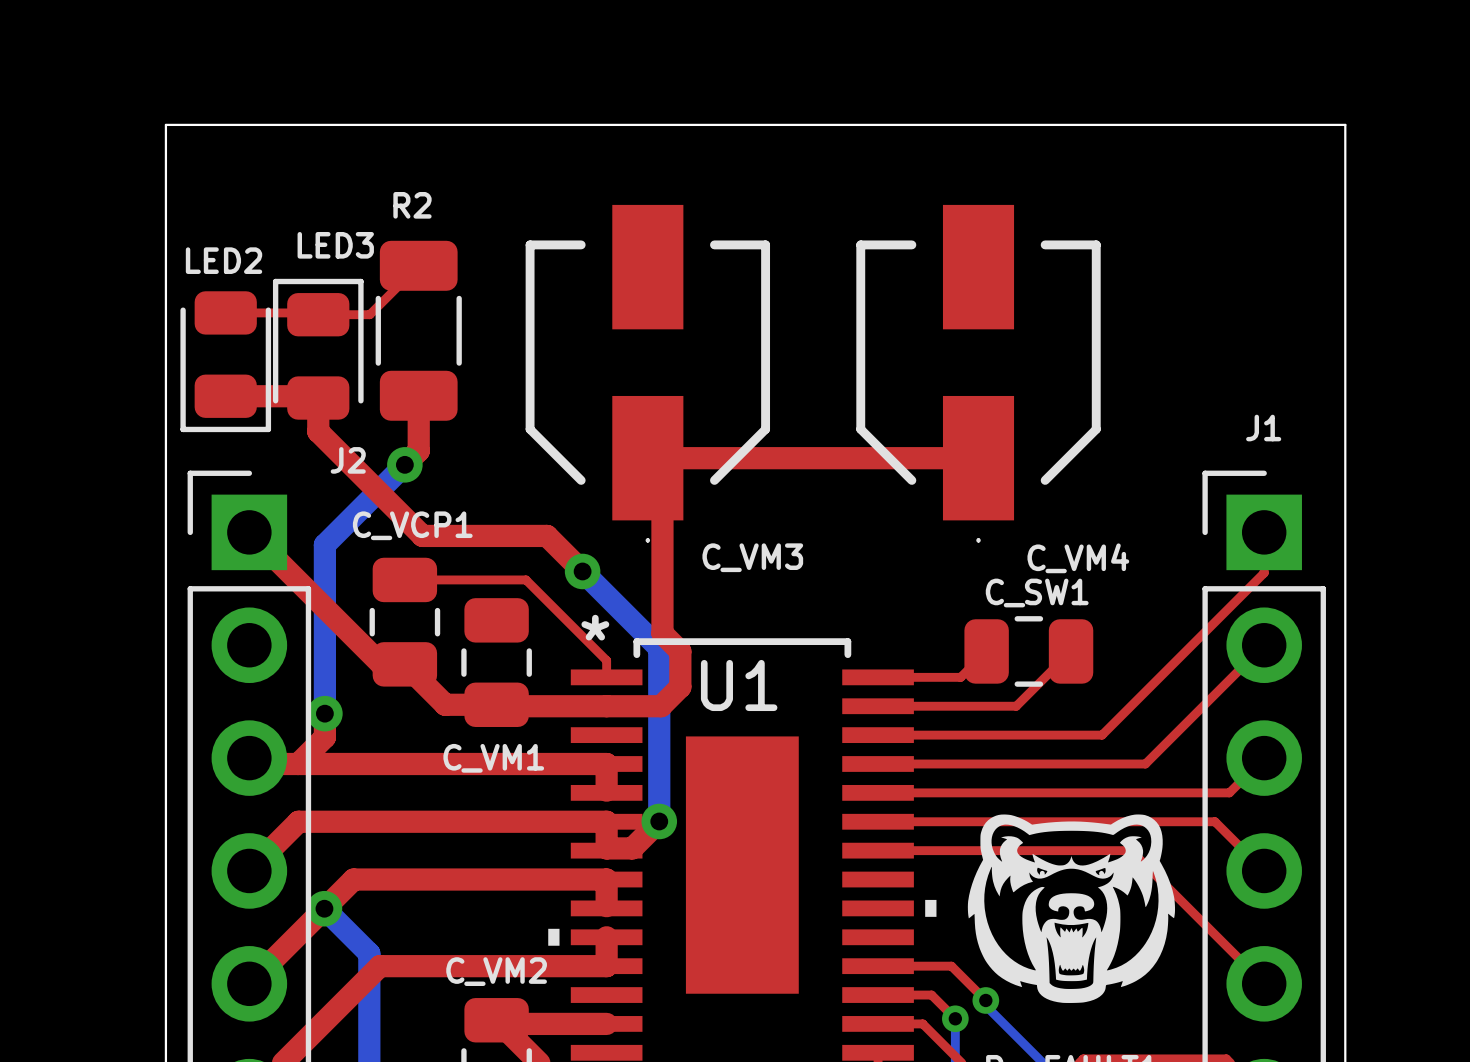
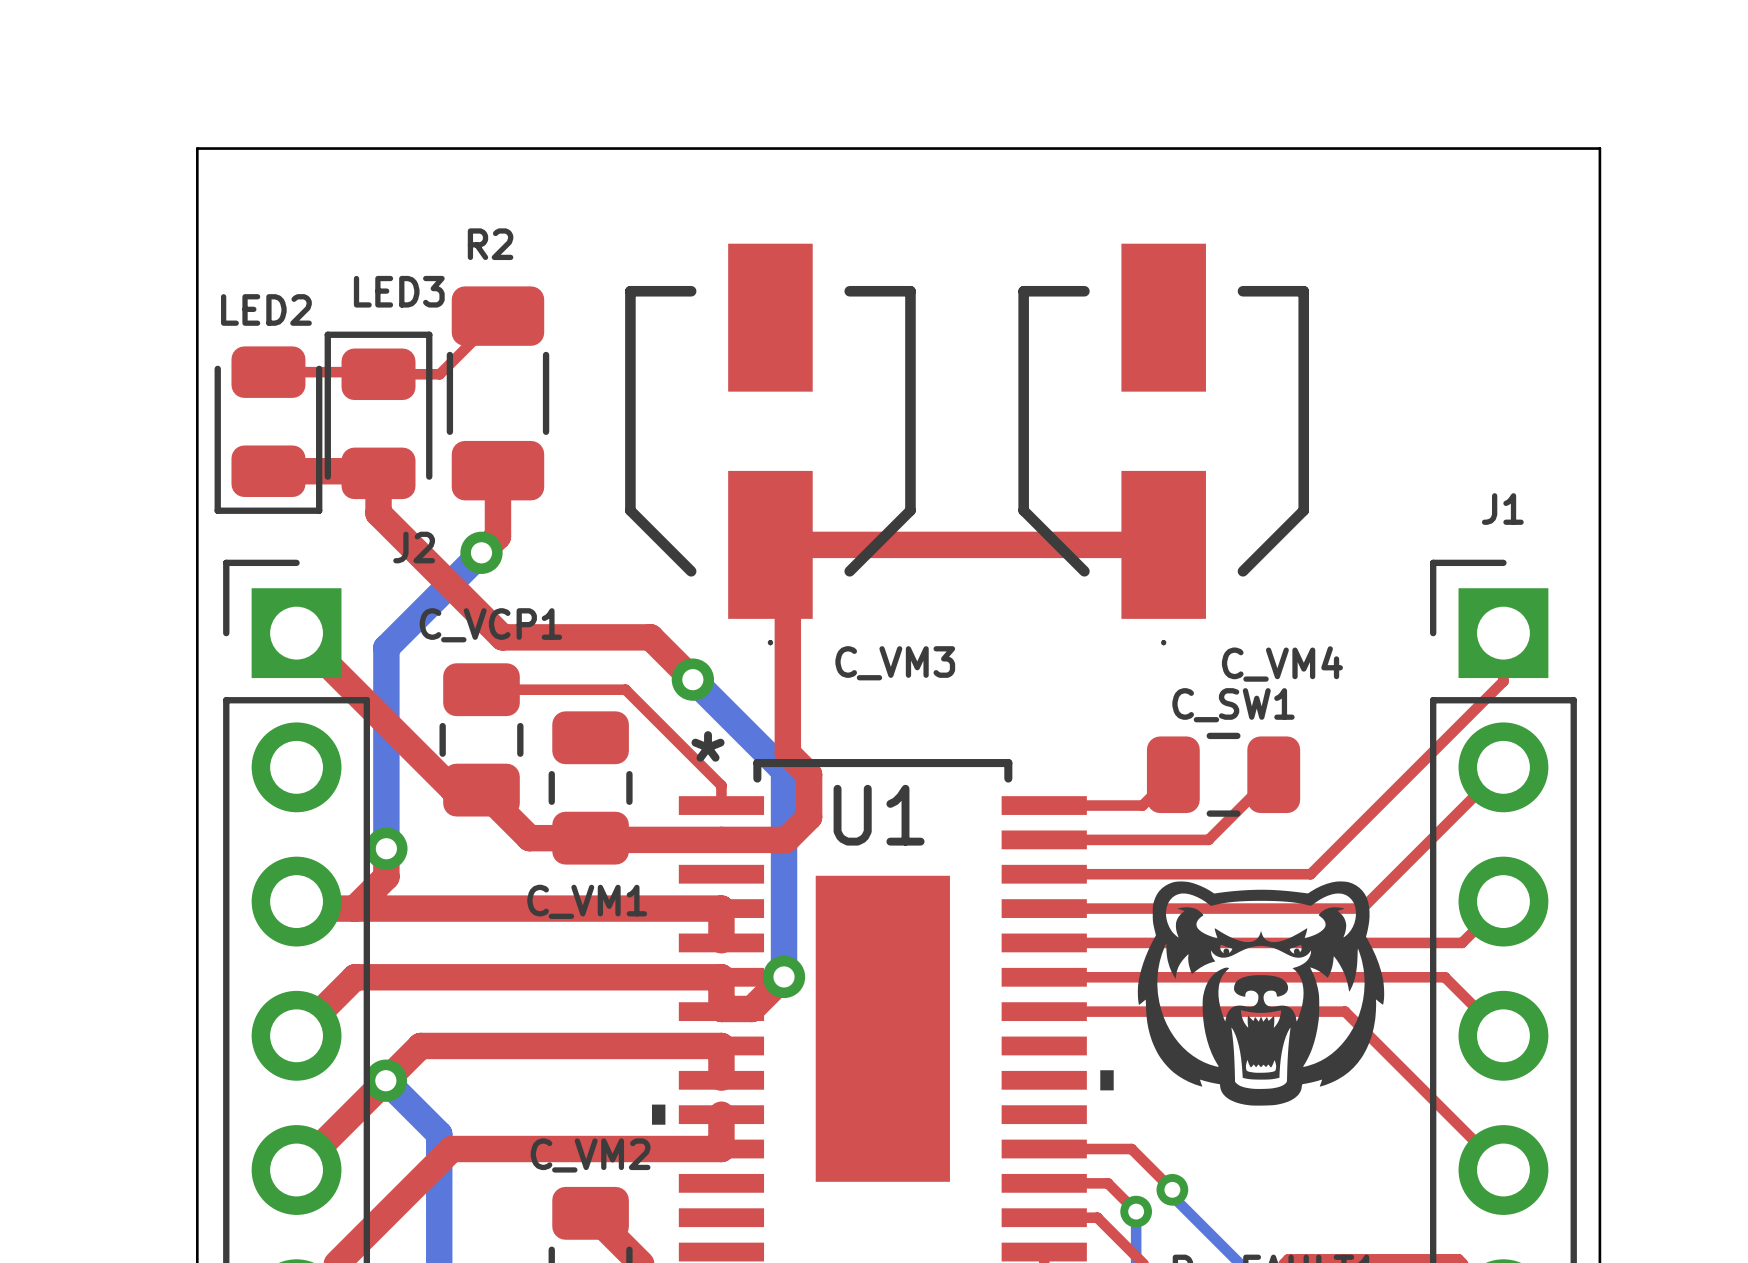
drawing position: (1071, 908) -> (1260, 993)
top track: (500, 1023) (606, 1023) -> none

